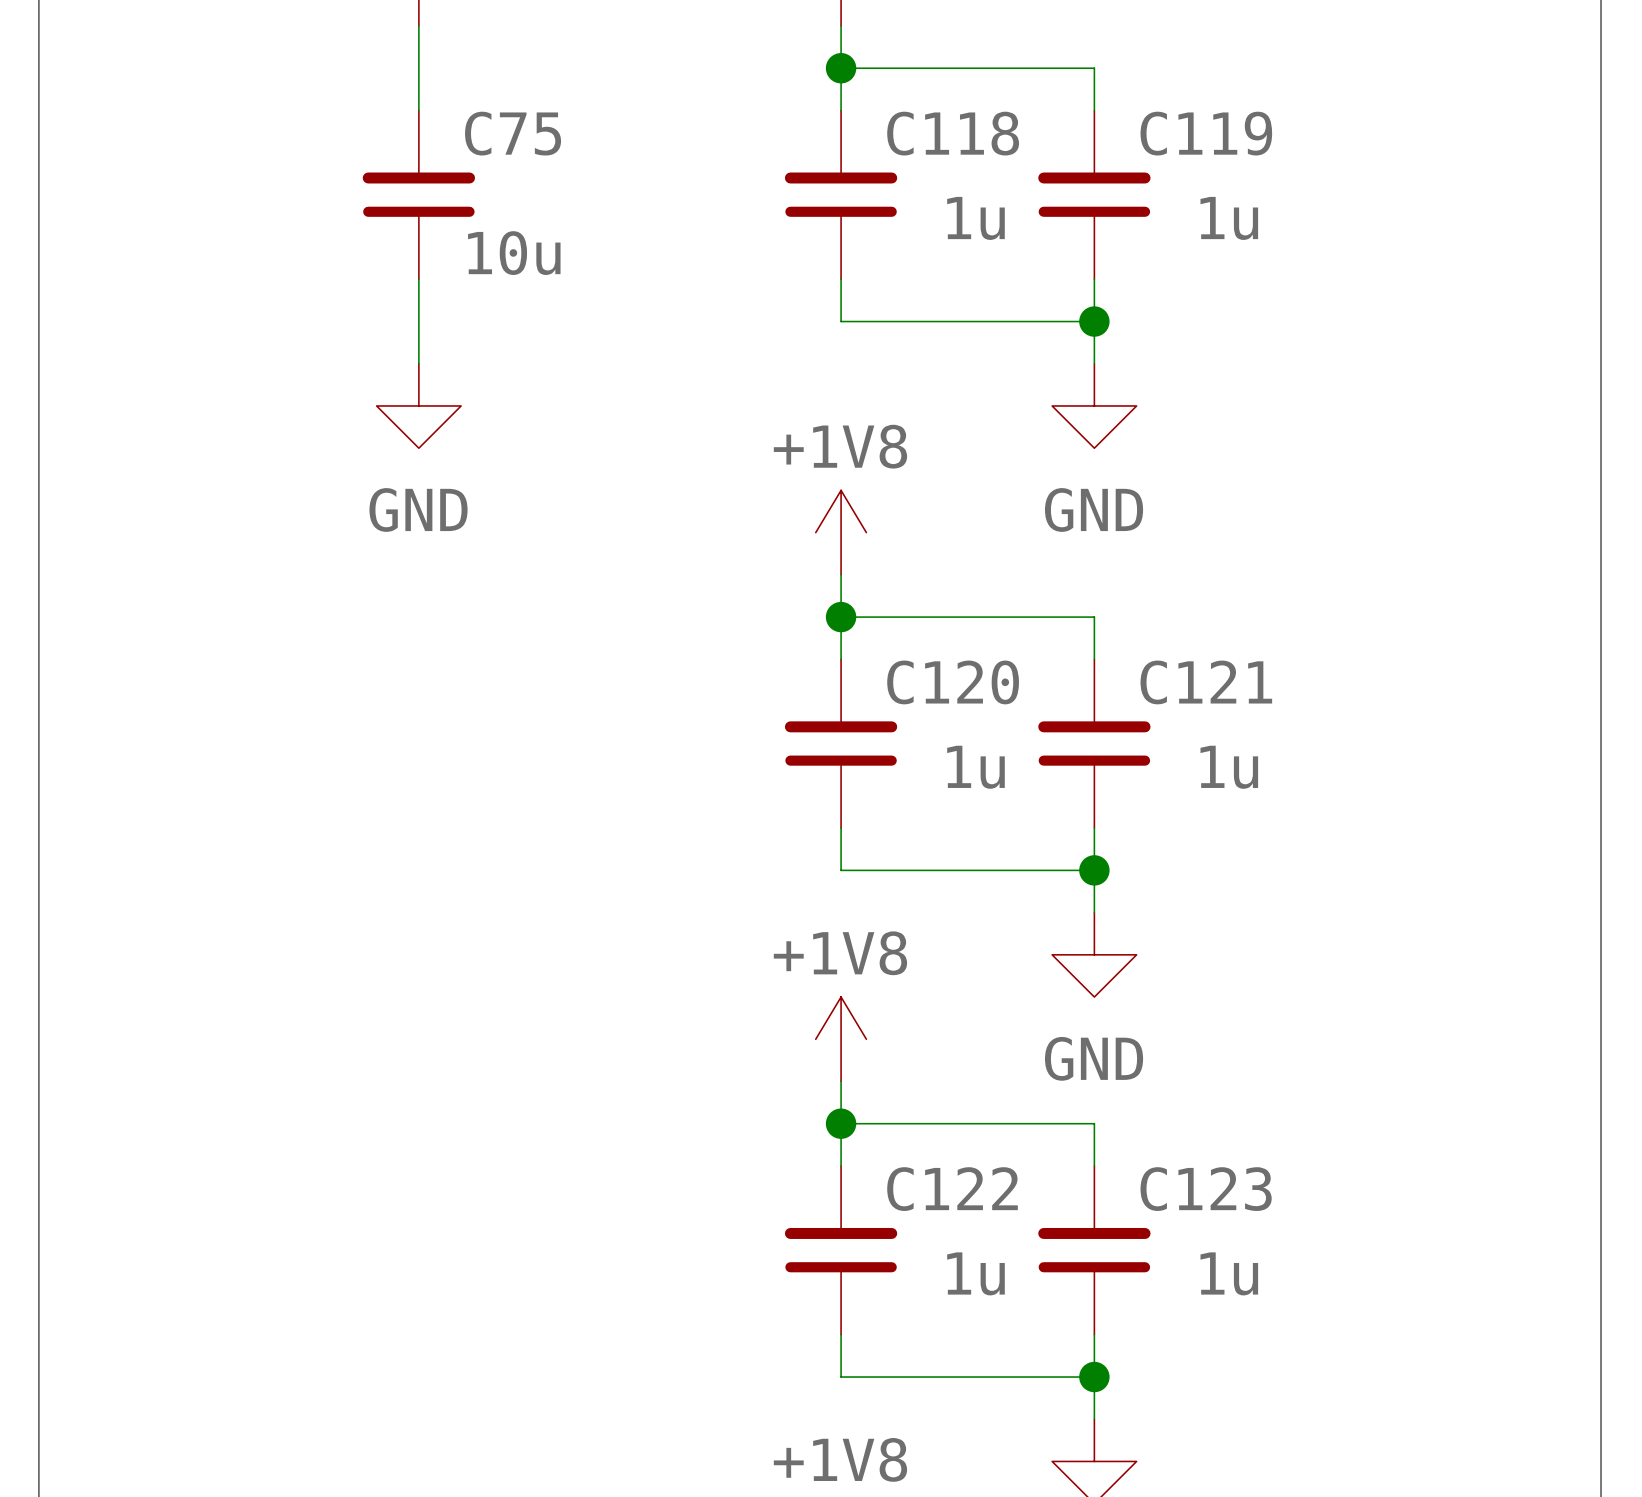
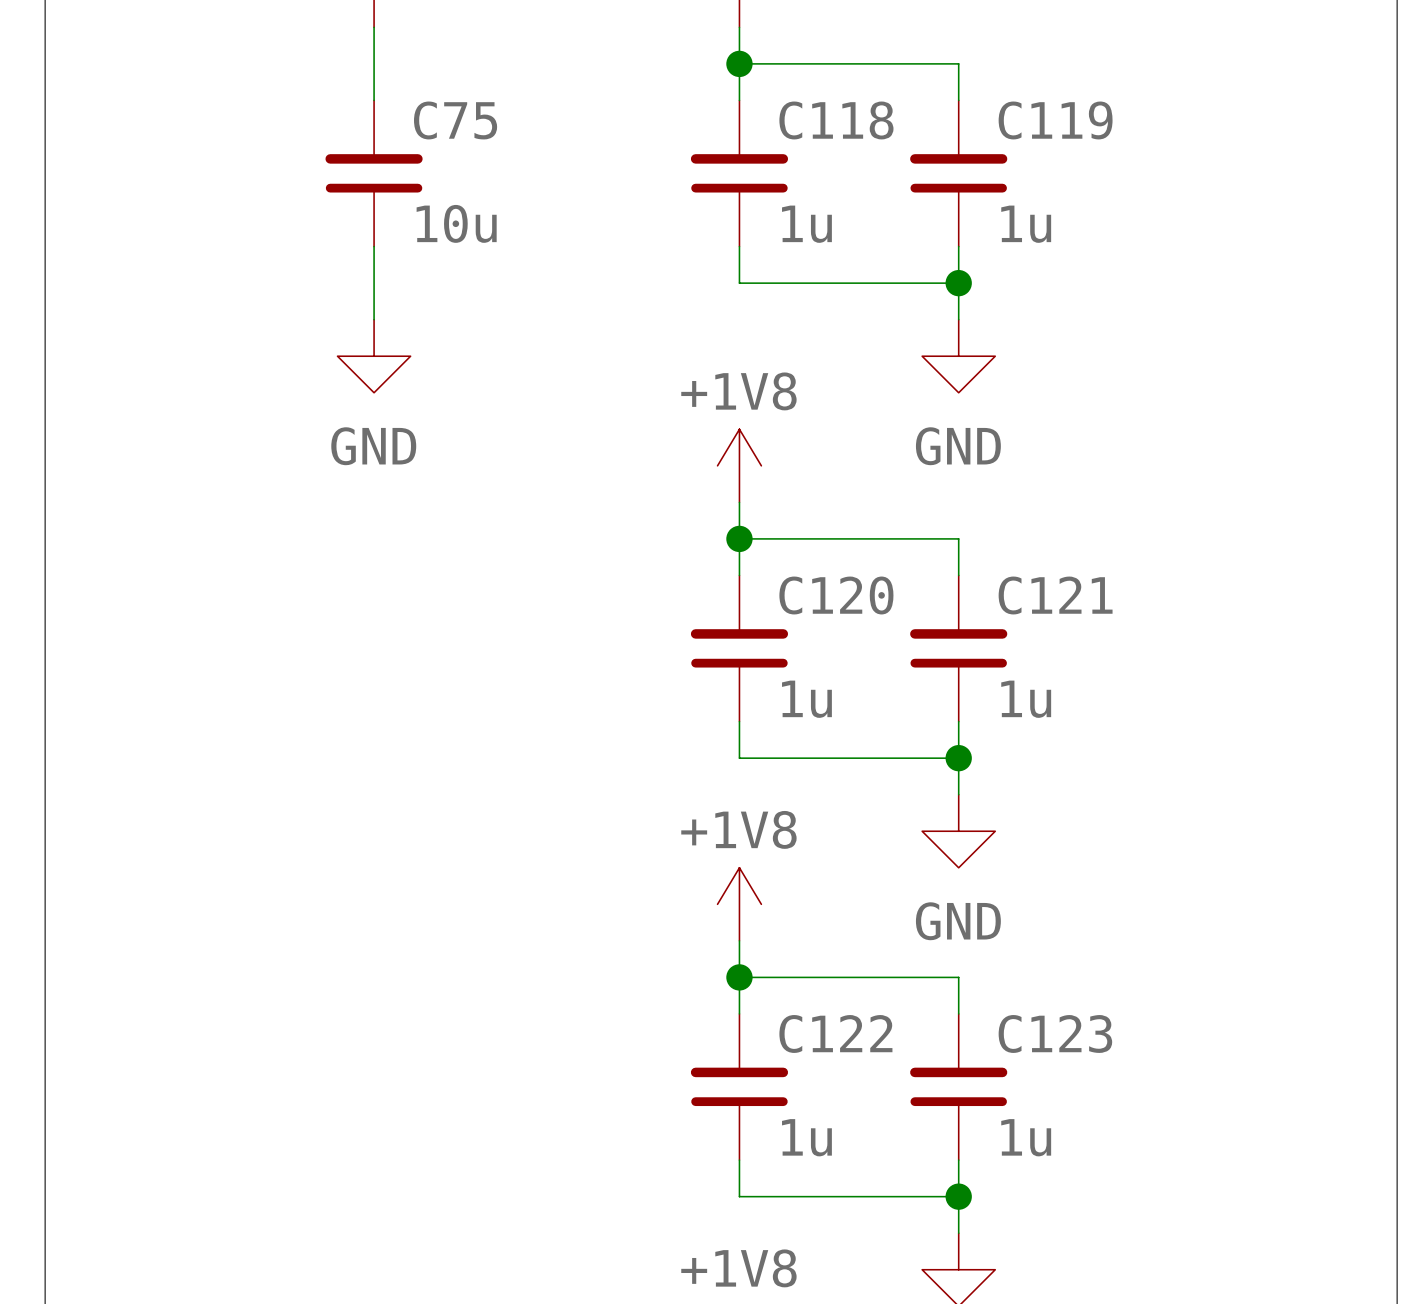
C118 text position: 1u (975, 218) -> 1u (806, 224)
C119 text position: 1u (1229, 218) -> 1u (1026, 224)
C120 text position: 1u (975, 767) -> 1u (806, 699)
C121 text position: 1u (1229, 767) -> 1u (1026, 699)
C122 text position: 1u (975, 1273) -> 1u (806, 1137)
C123 text position: 1u (1229, 1273) -> 1u (1026, 1137)

